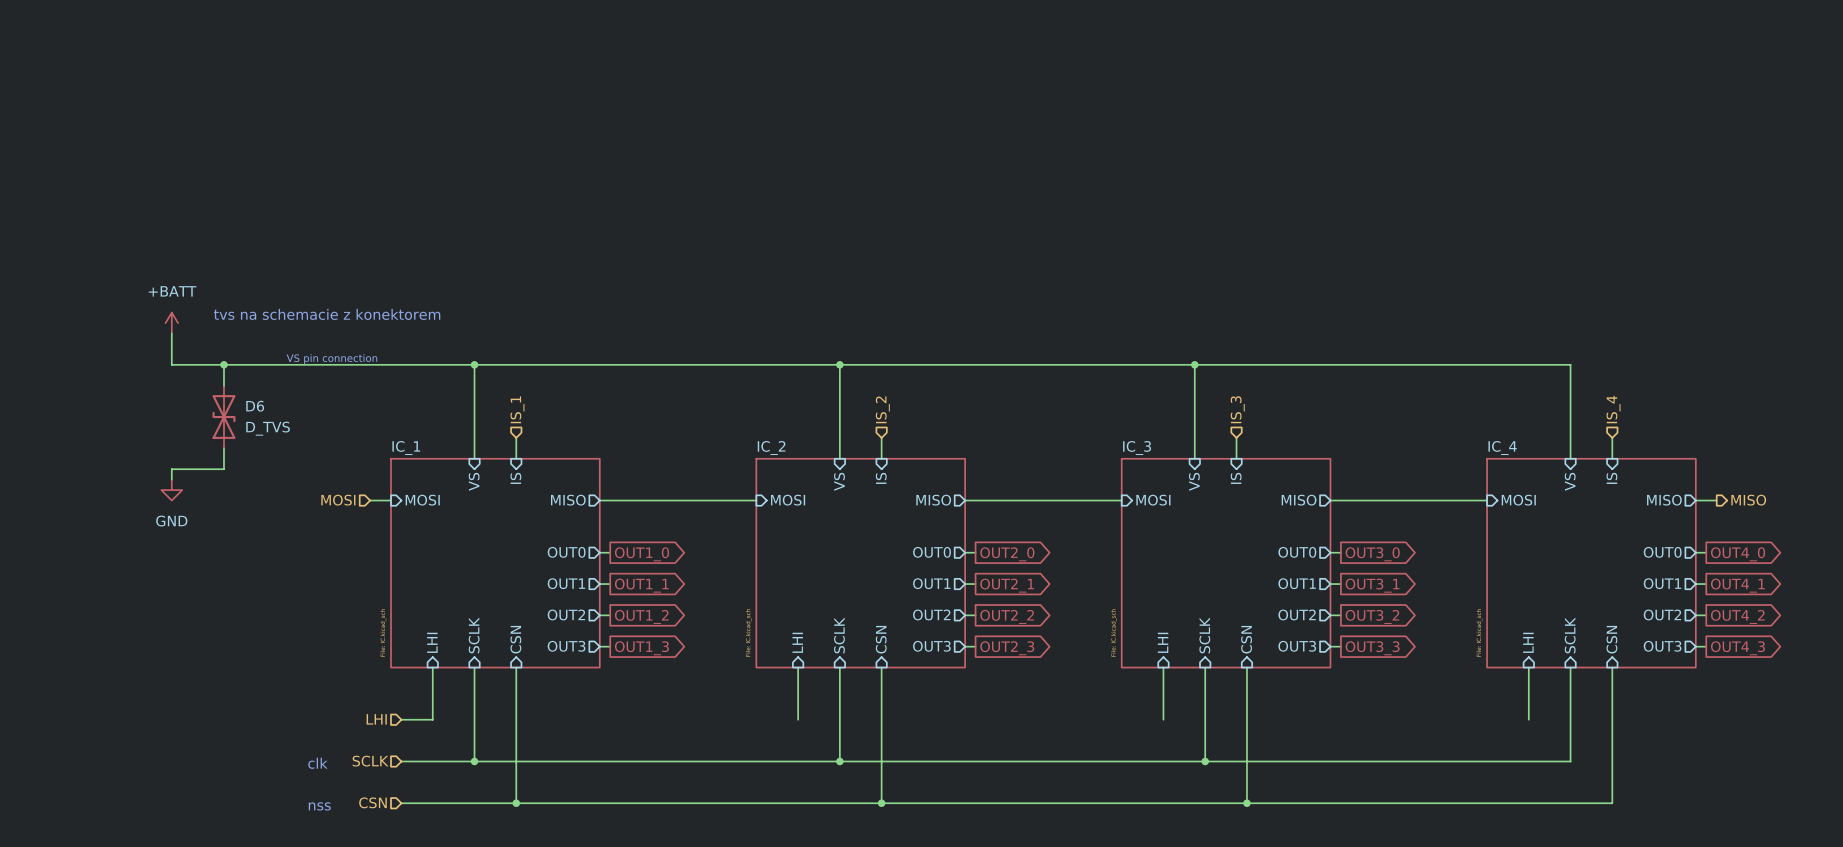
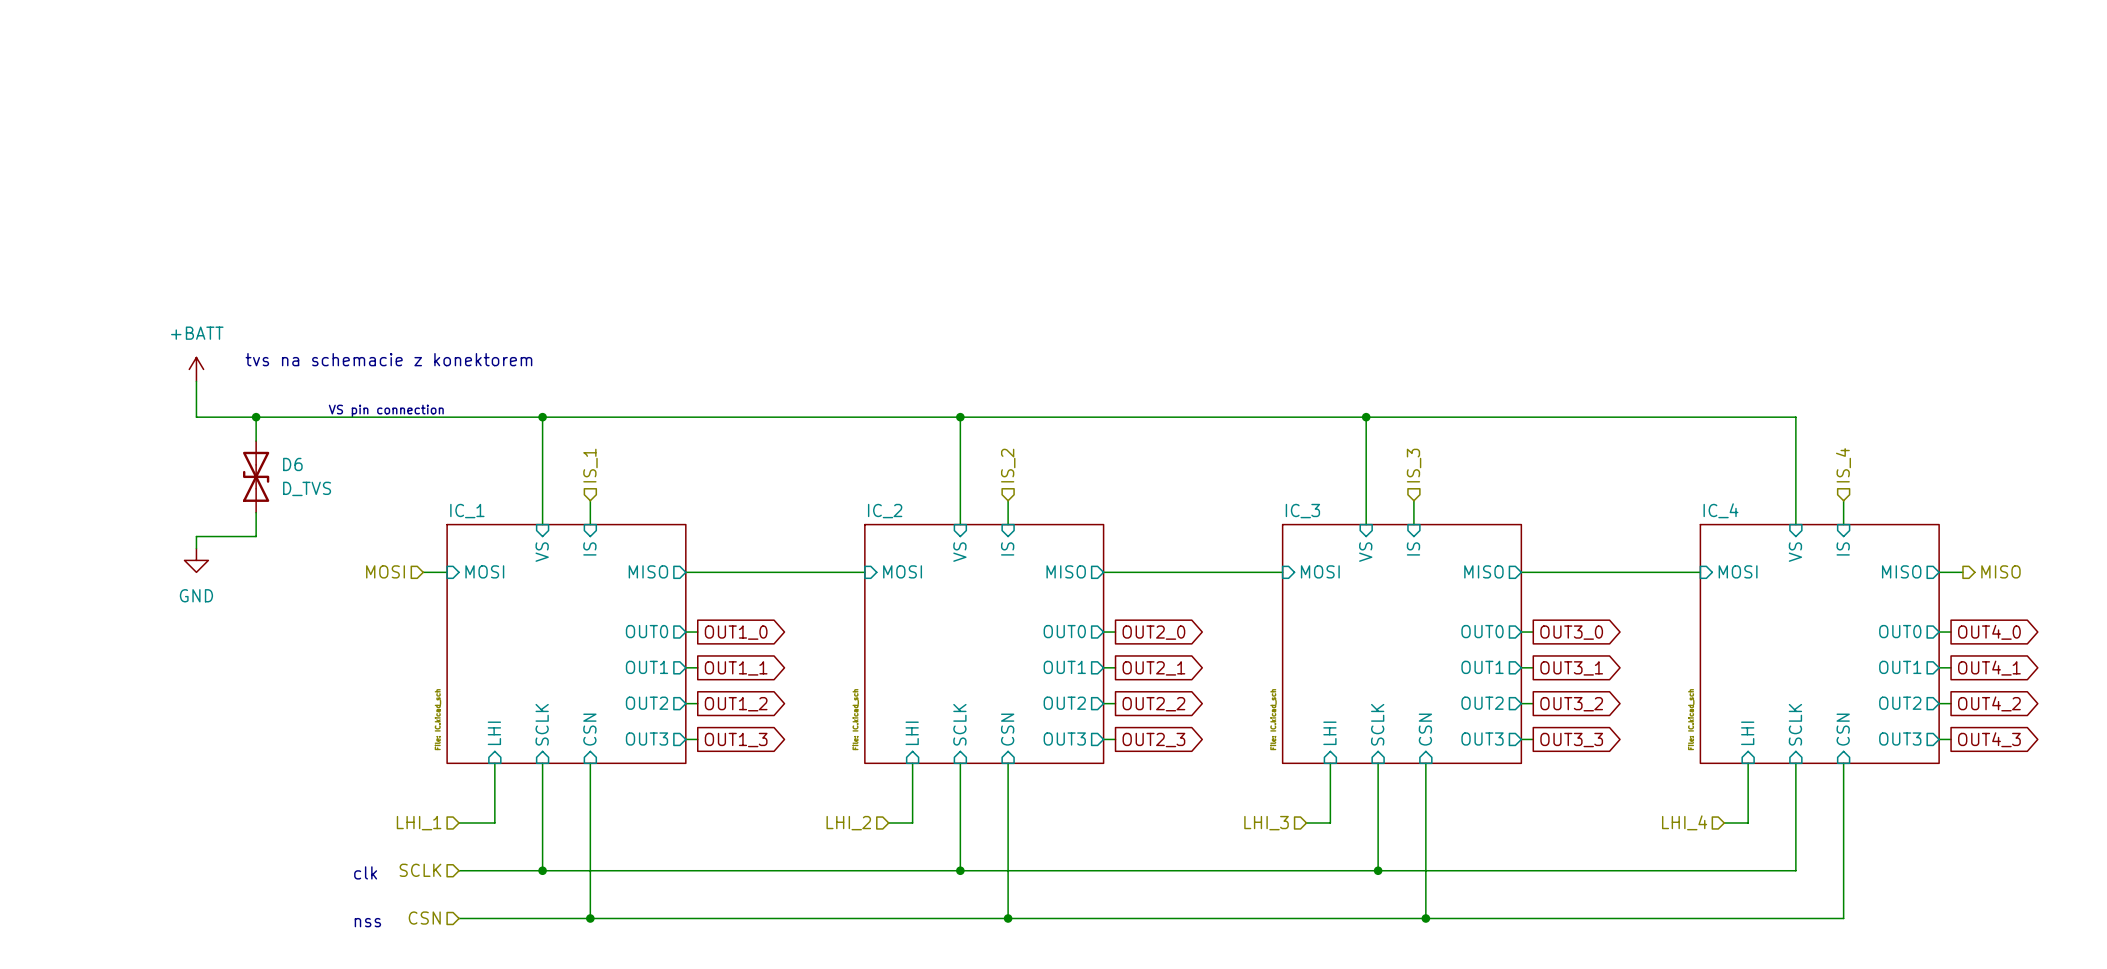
hierarchical label: LHI (376, 719) -> LHI_1 (419, 823)
wire: none -> (888, 823) (912, 823)
wire: none -> (1306, 823) (1330, 823)
wire: none -> (1724, 823) (1748, 823)
hierarchical label: none -> LHI_2 (848, 823)
hierarchical label: none -> LHI_3 (1266, 823)
hierarchical label: none -> LHI_4 (1684, 822)

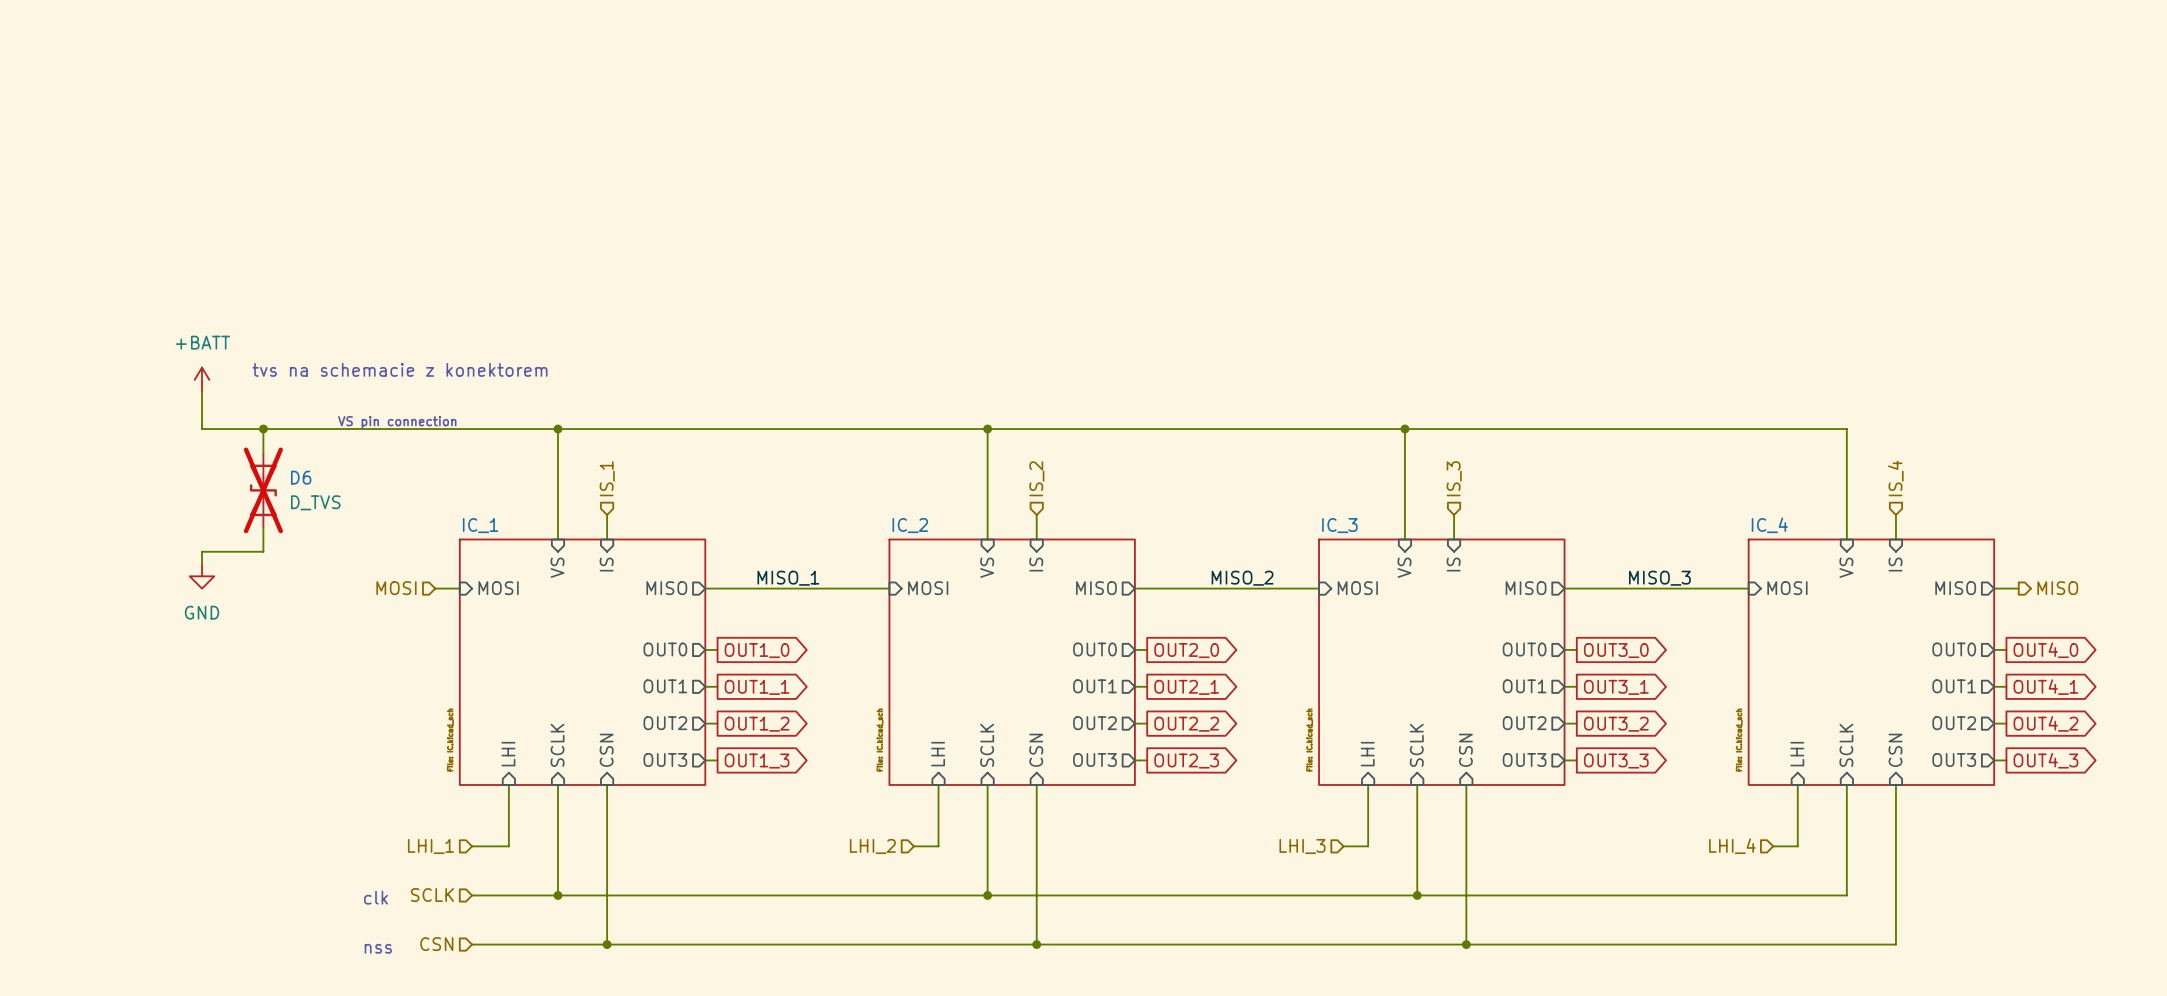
D6 do-not-place cross: none -> (263, 490)
label: none -> MISO_1 (788, 578)
label: none -> MISO_2 (1242, 578)
label: none -> MISO_3 (1659, 578)

